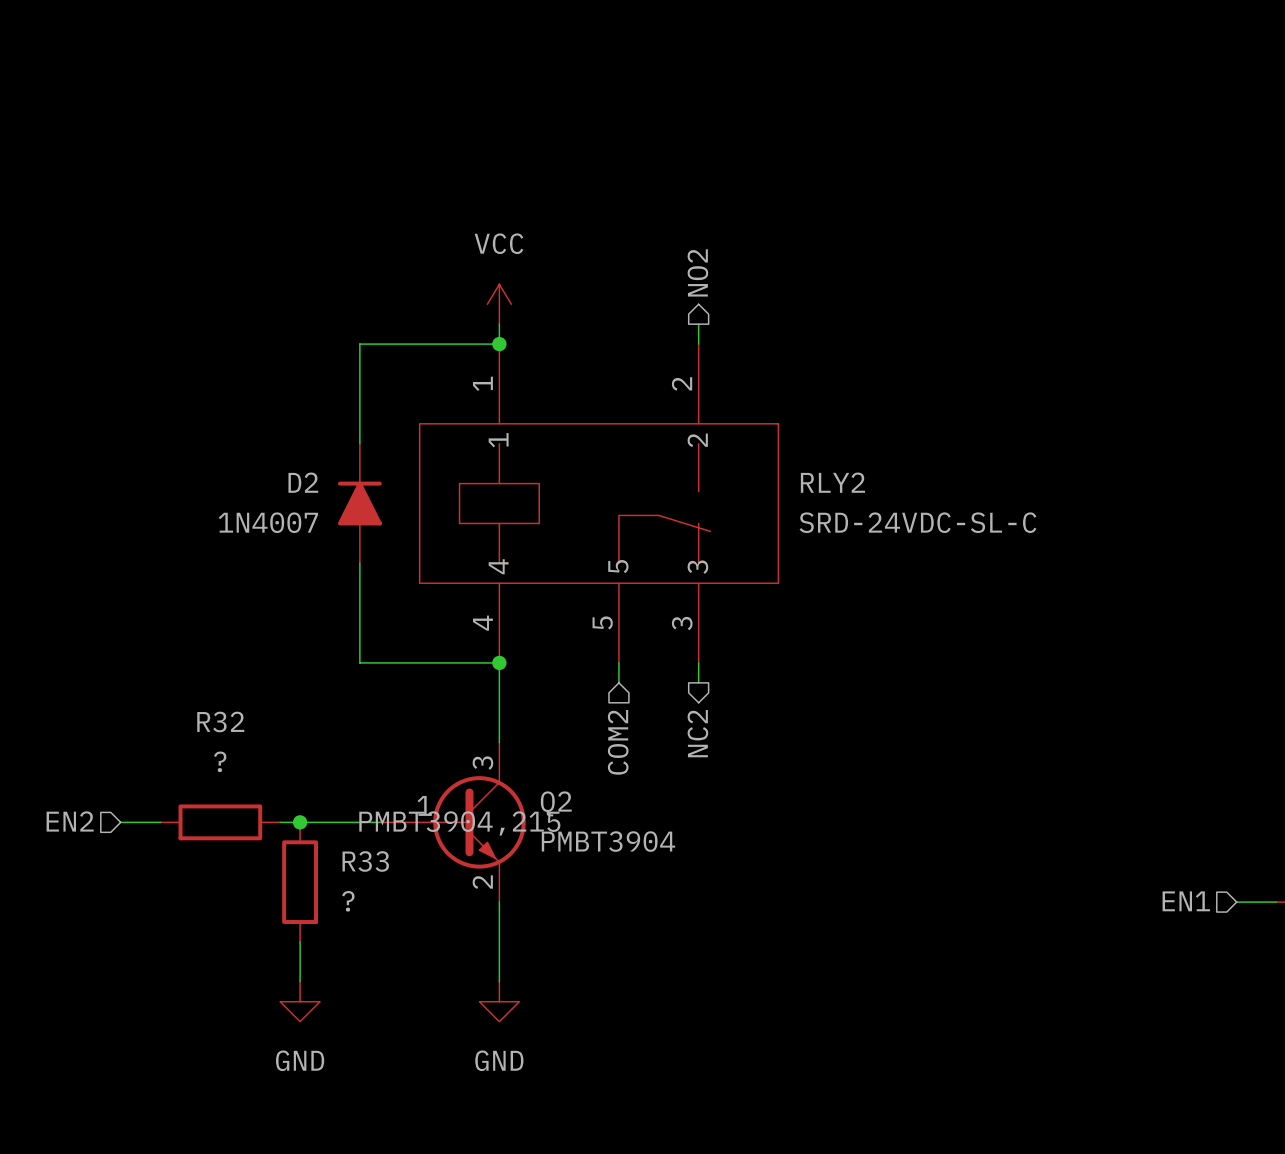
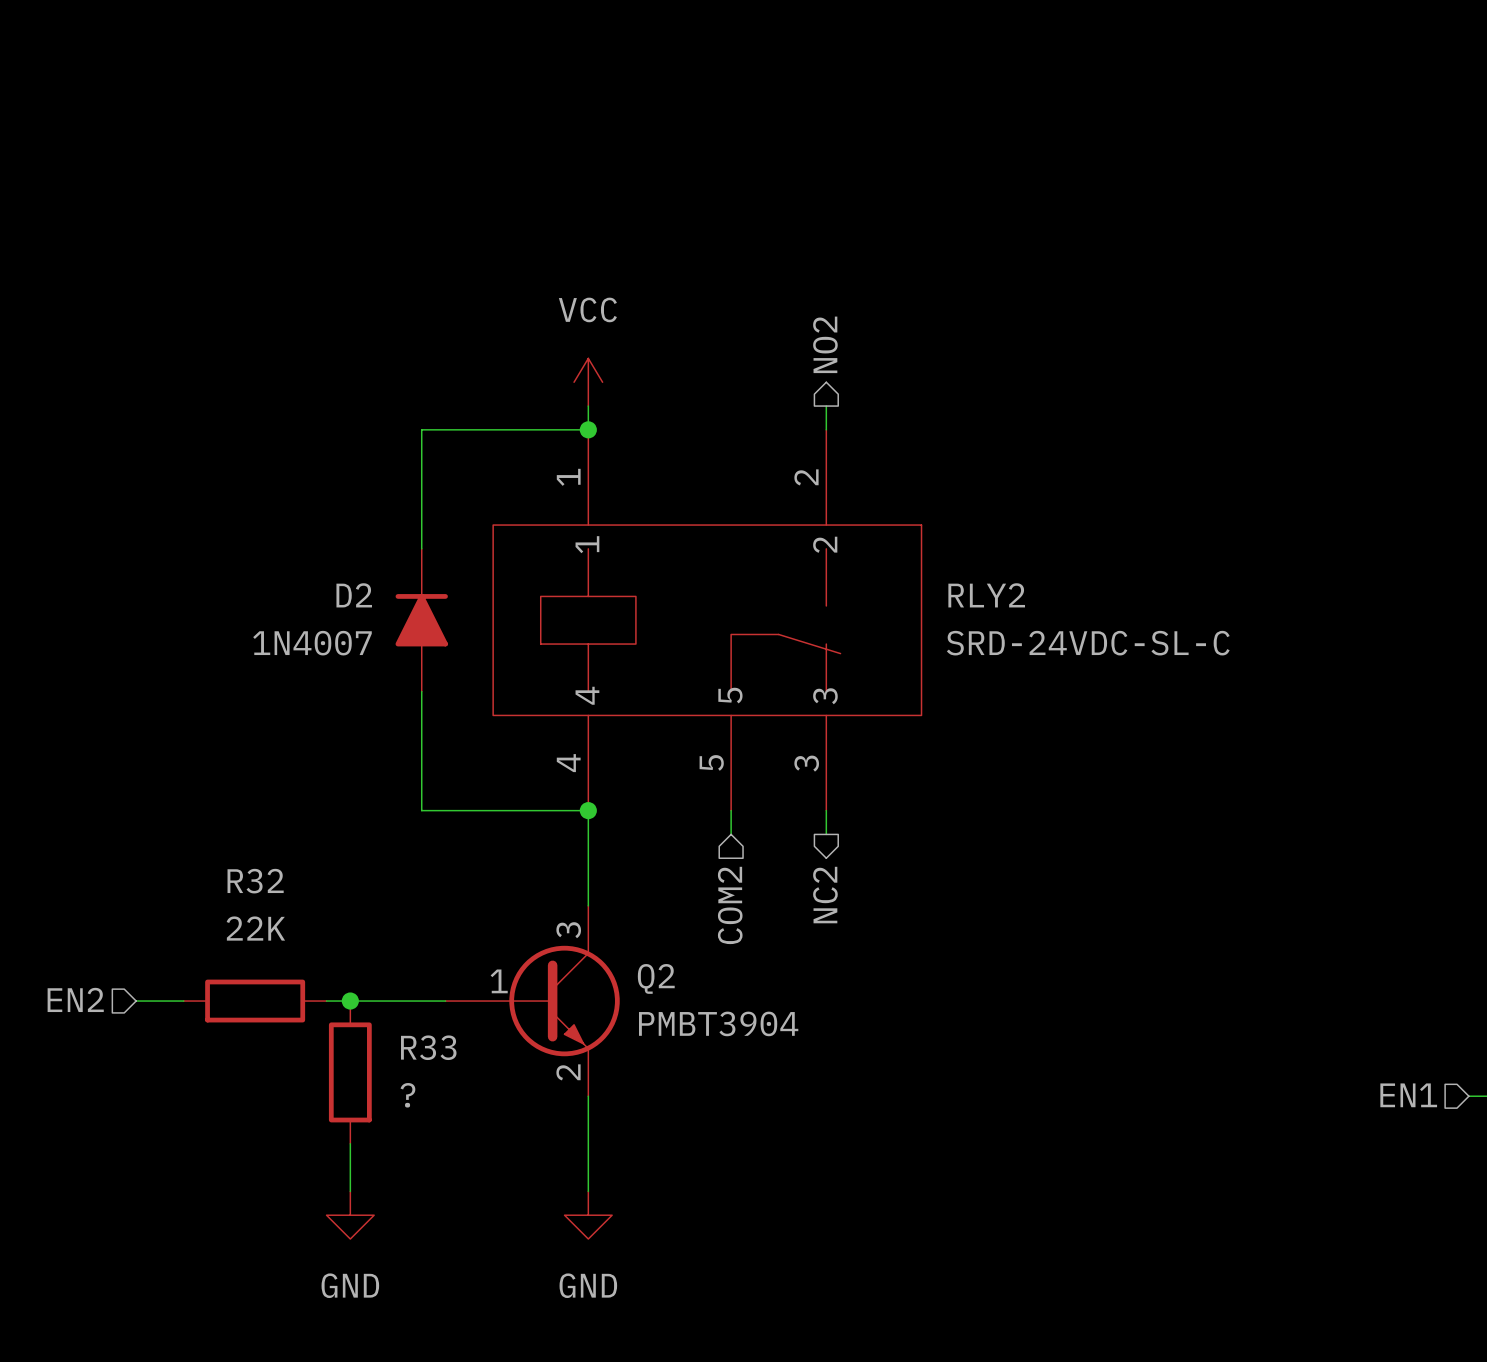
R32 value: ? (220, 761) -> 22K (255, 928)
Q2 text: PMBT3904,215 (459, 823) -> none

